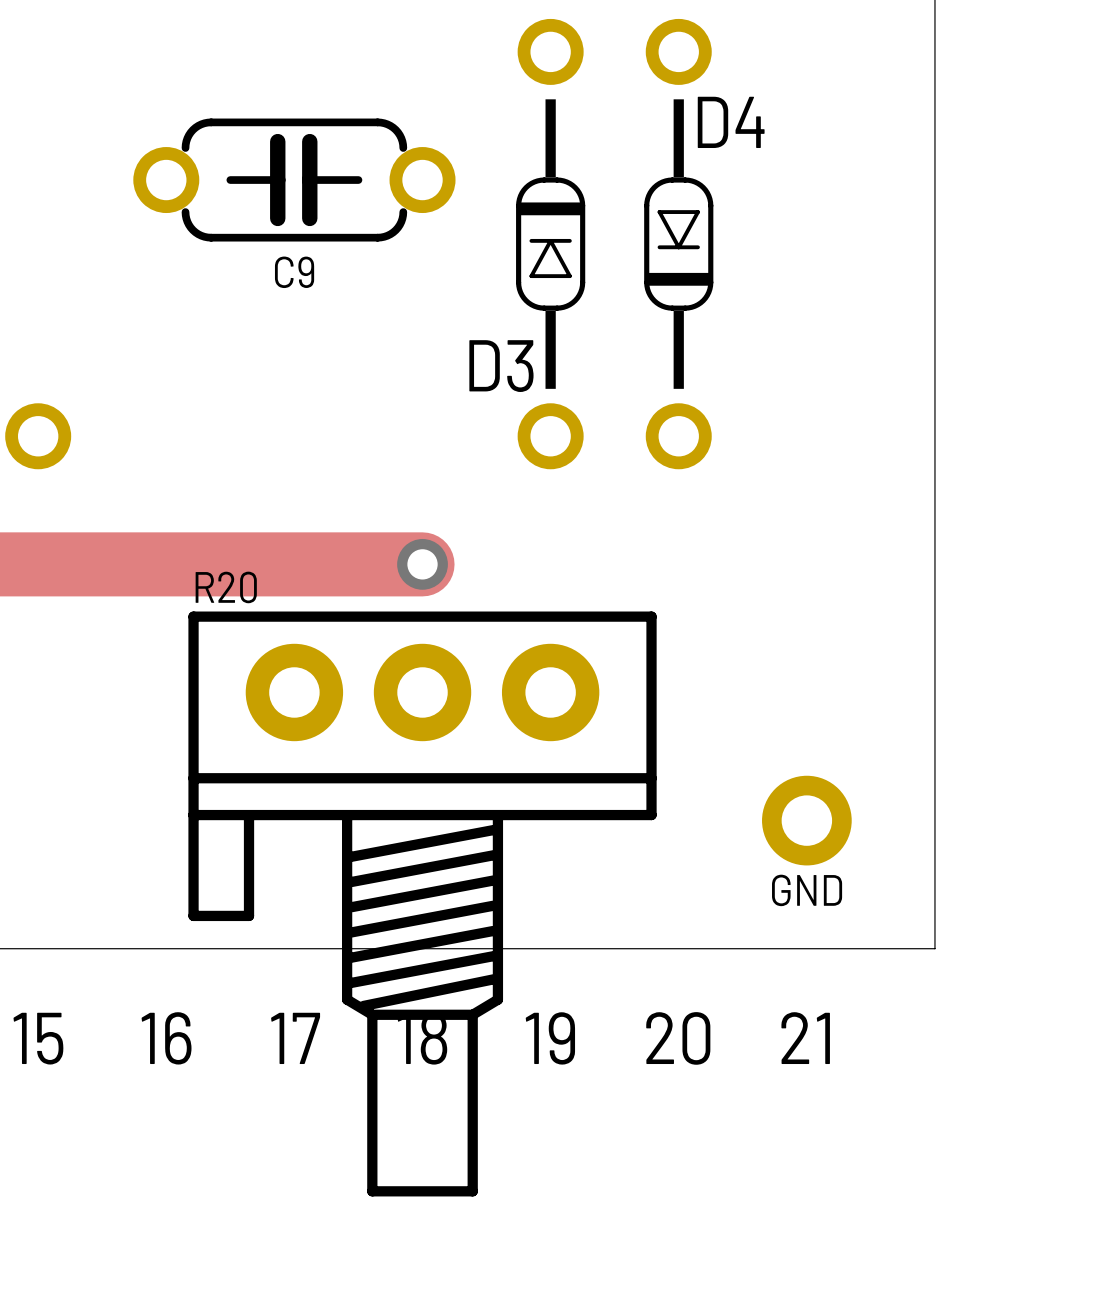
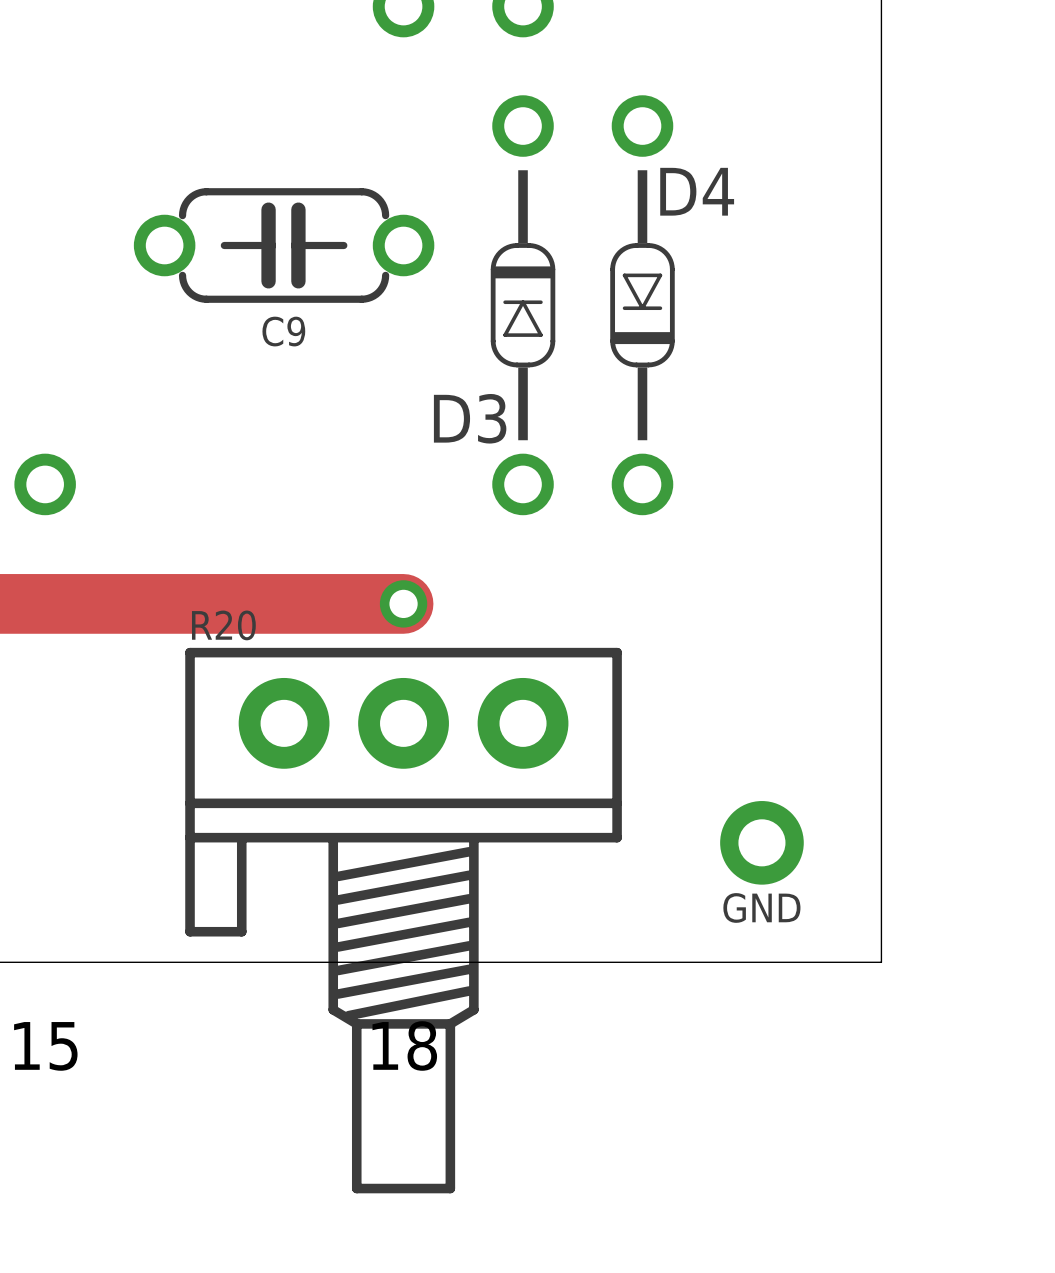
text: 16 (166, 1038) -> none
text: 17 (295, 1038) -> none
text: 19 (550, 1038) -> none
text: 20 (678, 1038) -> none
text: 21 (805, 1038) -> none

